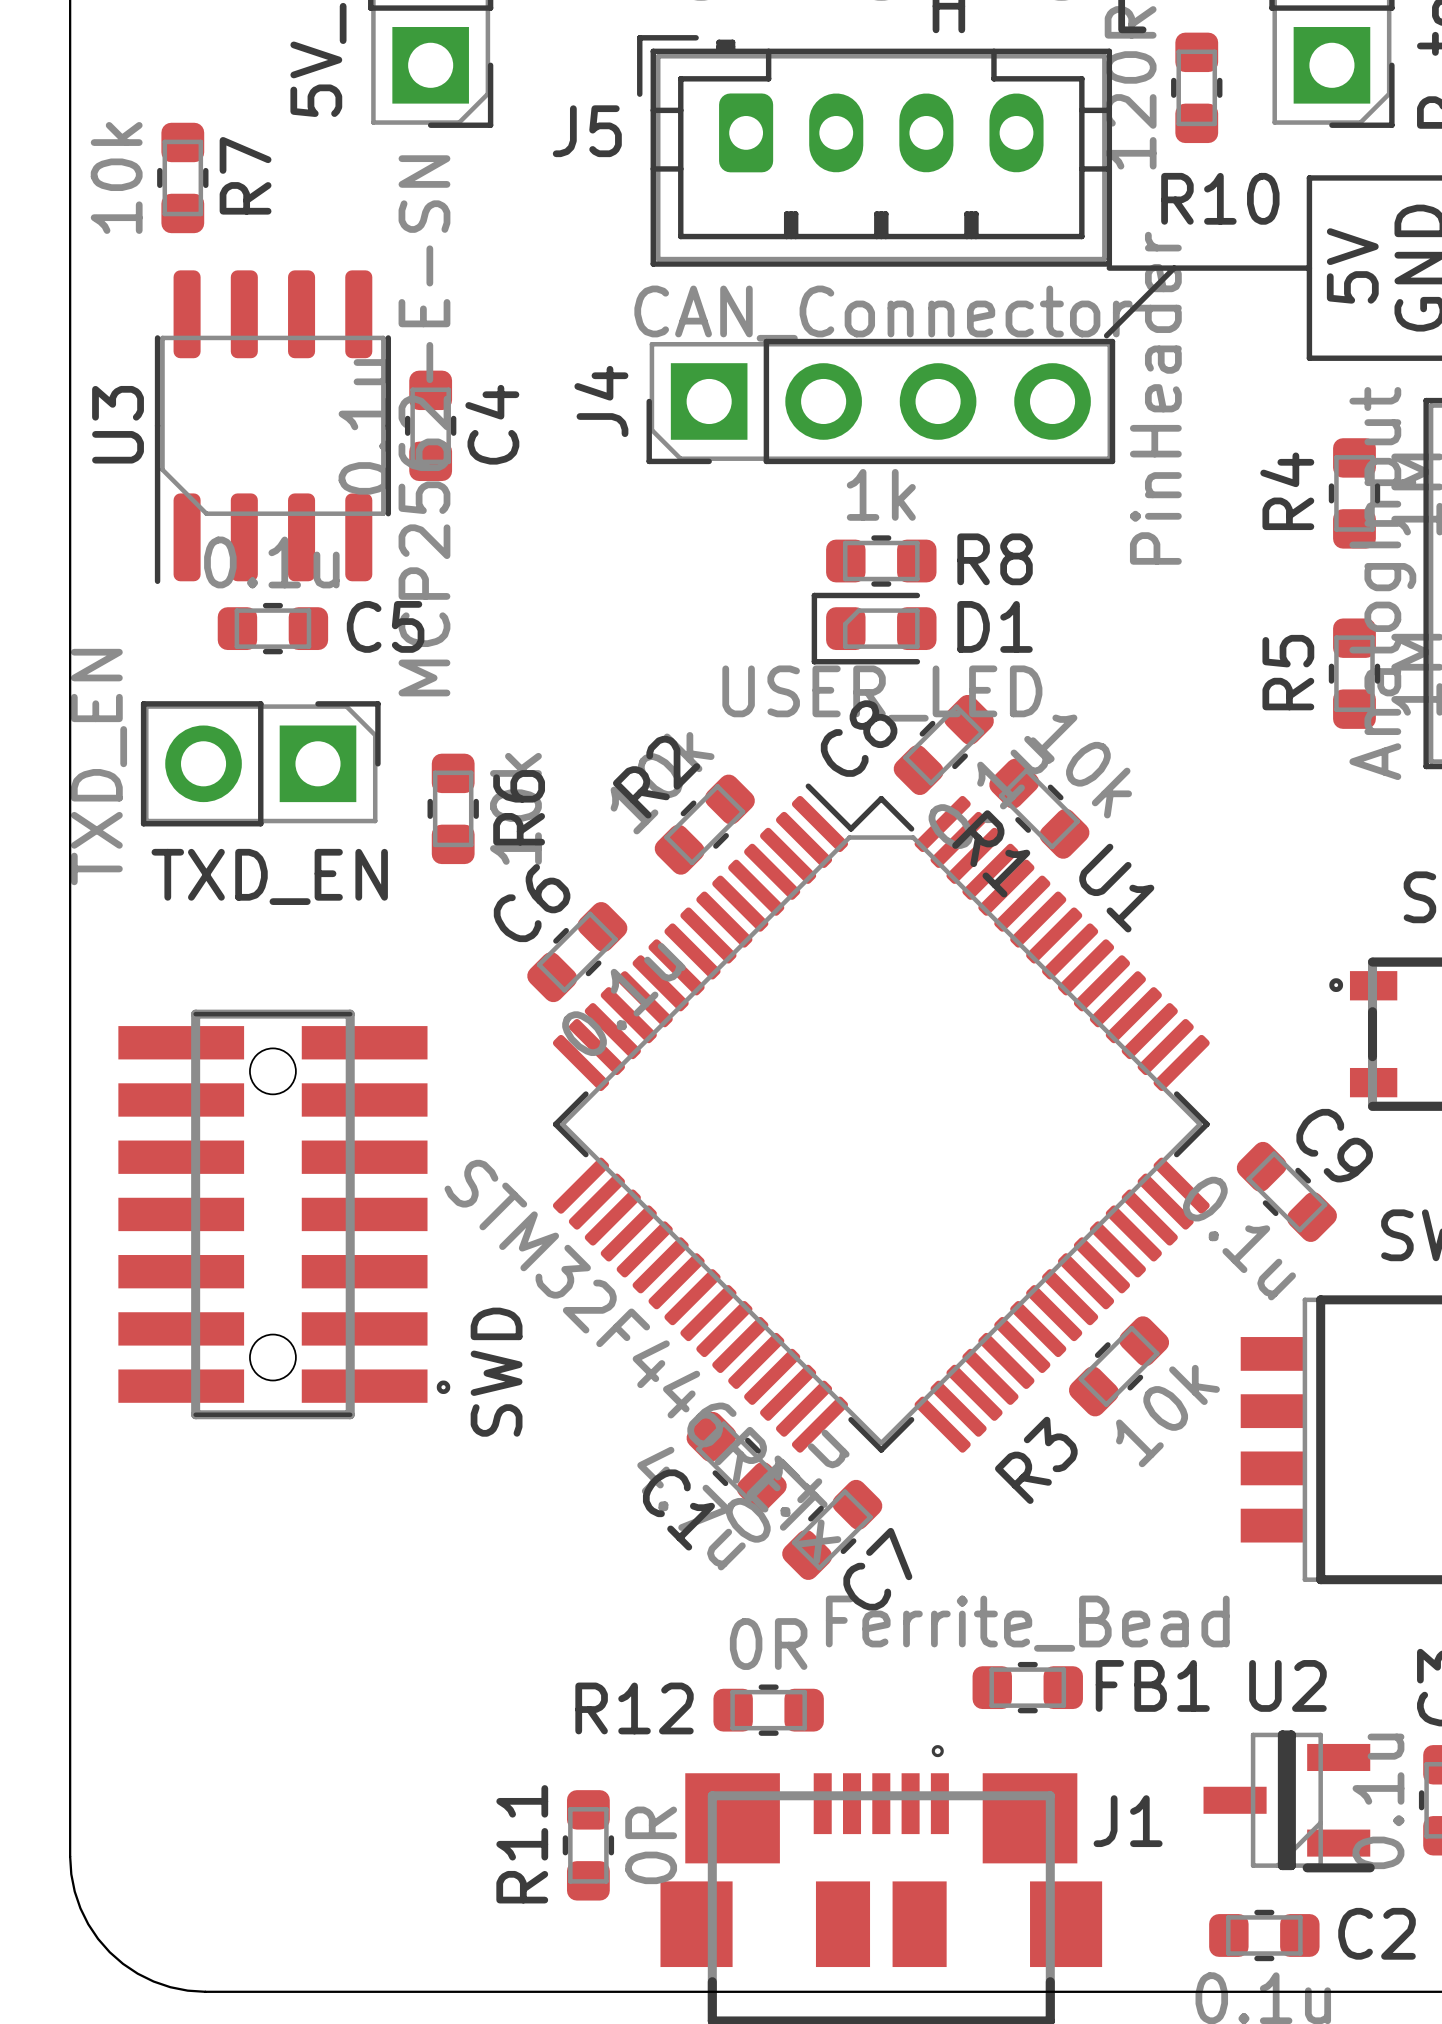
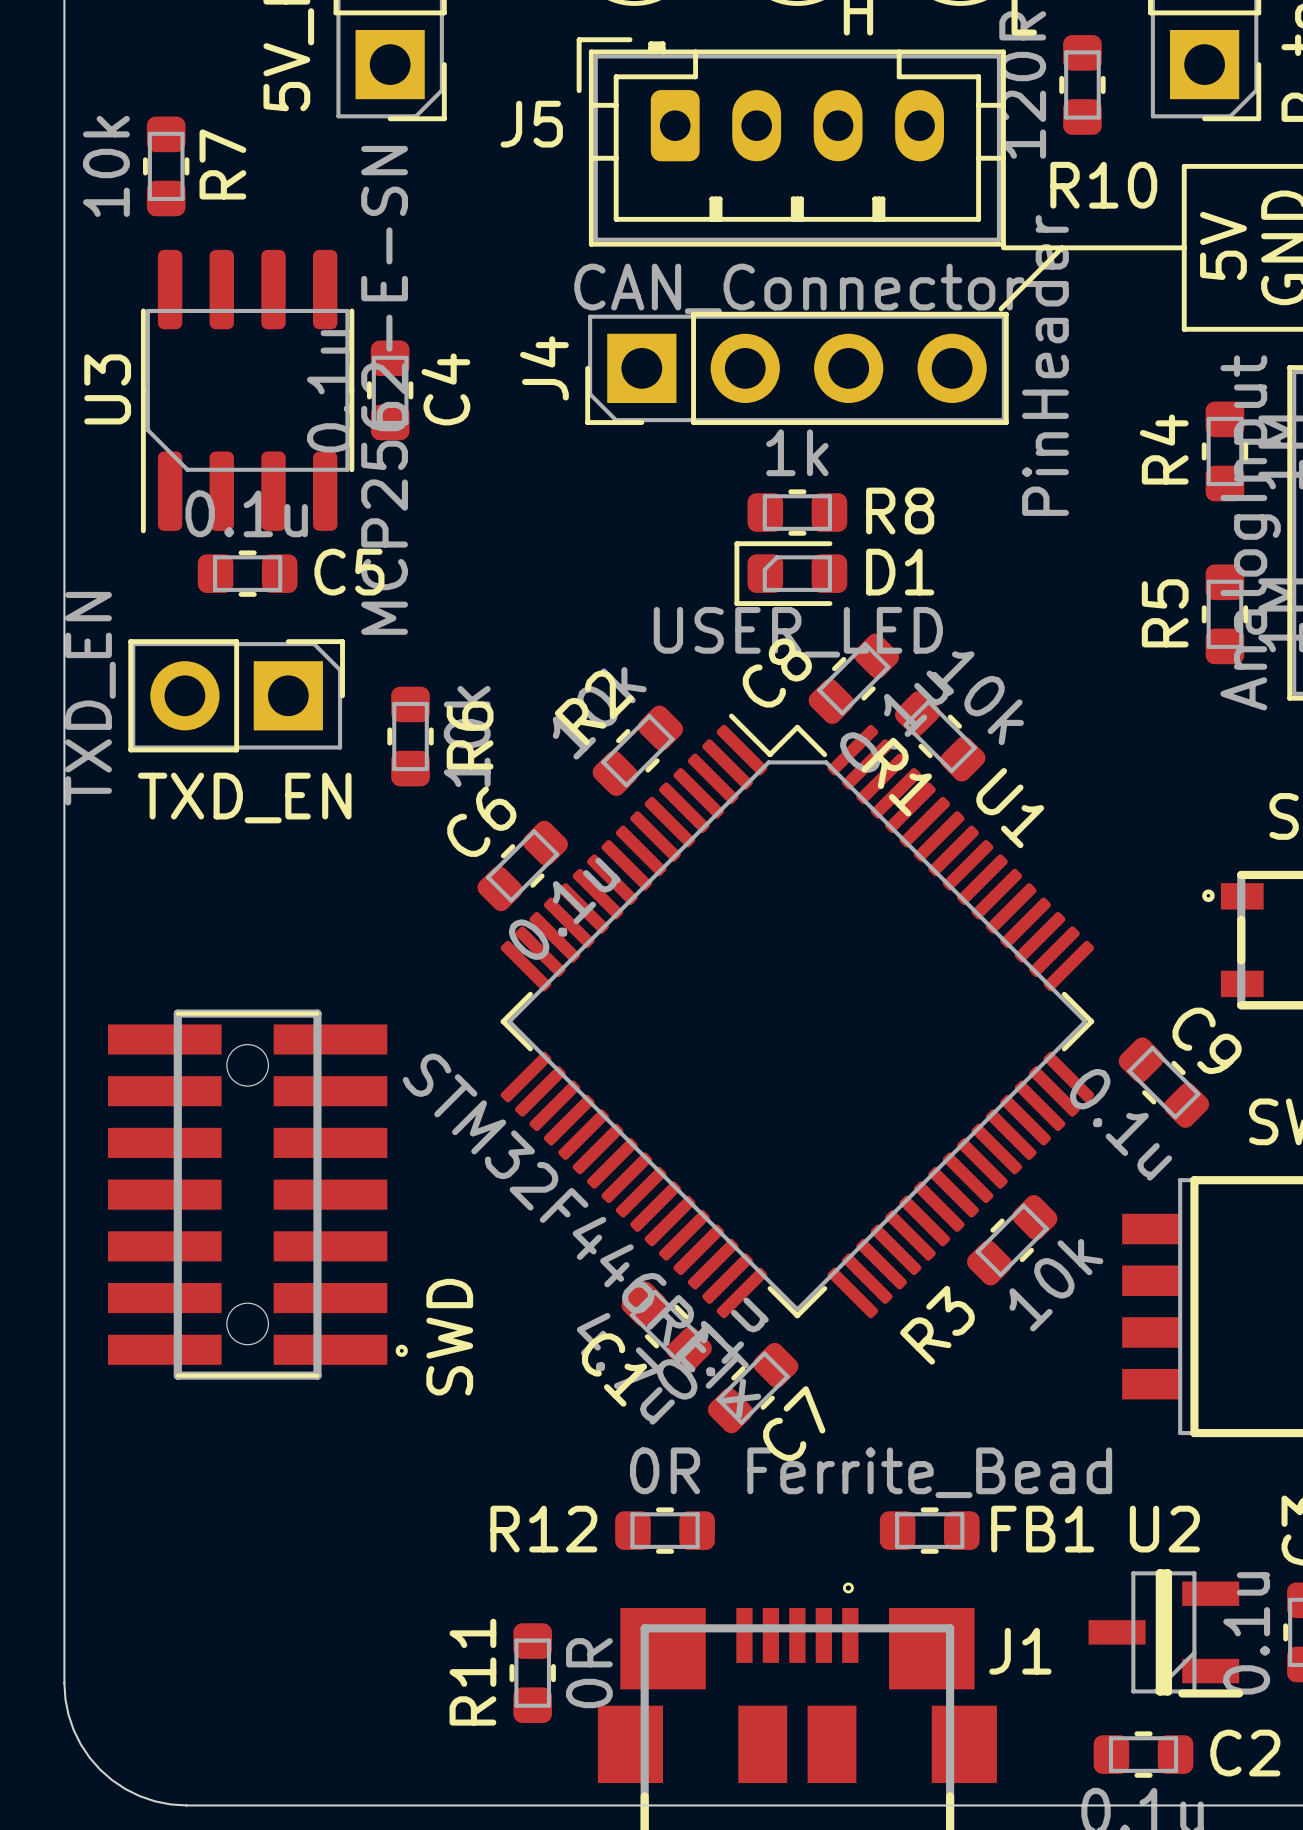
SWD position: (284, 1214) -> (257, 1194)
R12 position: (768, 1710) -> (665, 1530)

